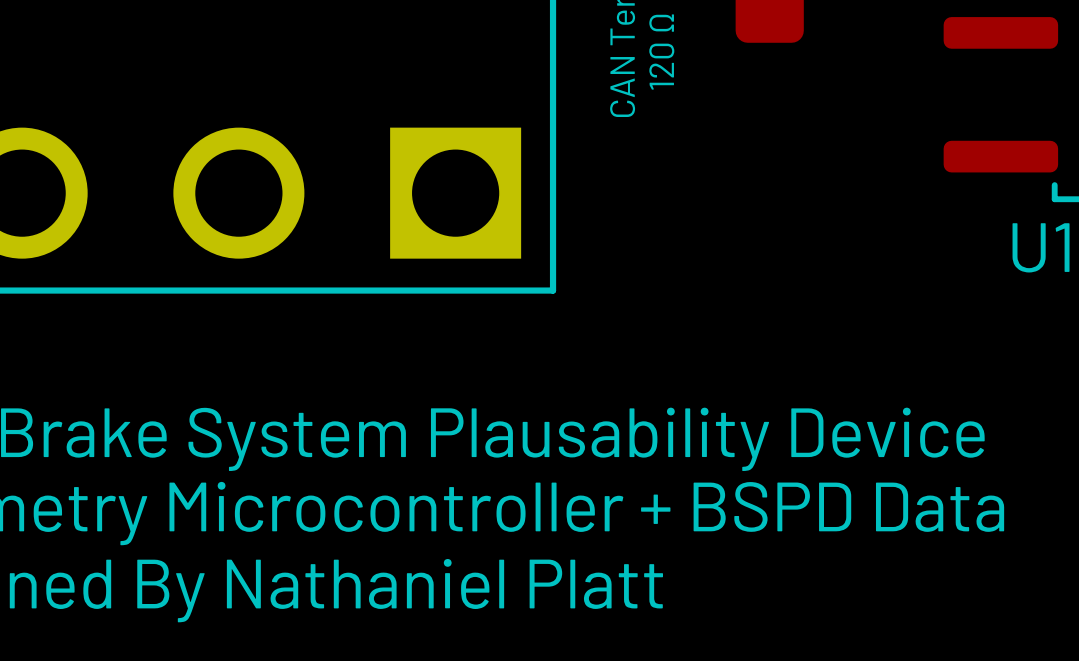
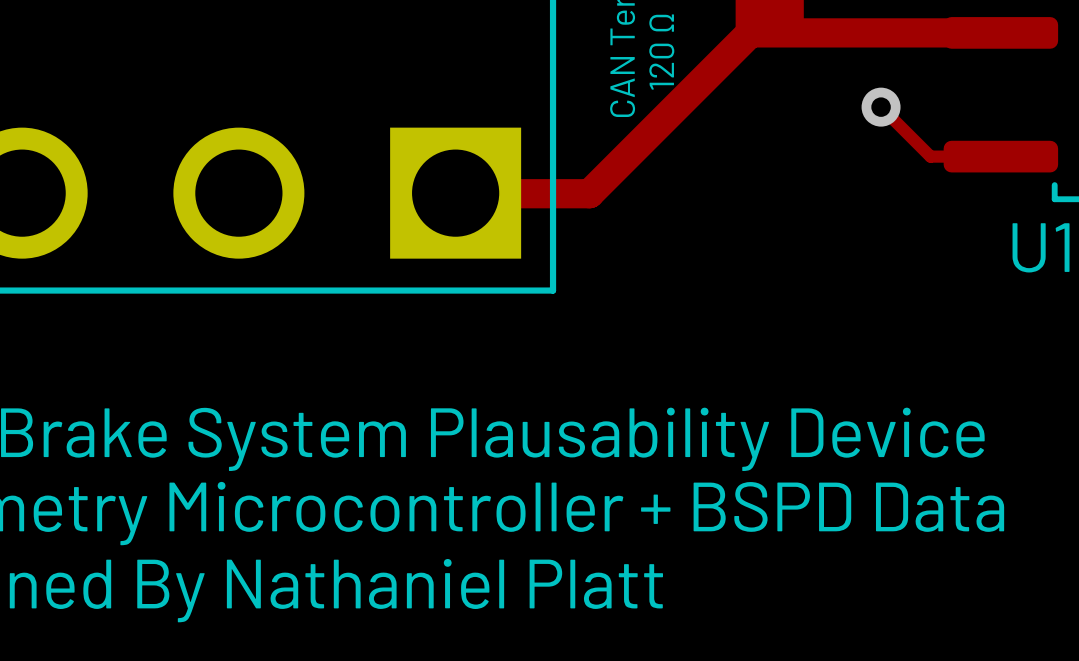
track: none -> (1000, 32) (750, 32) (589, 193) (456, 193)
track: none -> (881, 107) (930, 156) (1000, 156)
via: none -> (881, 107)

